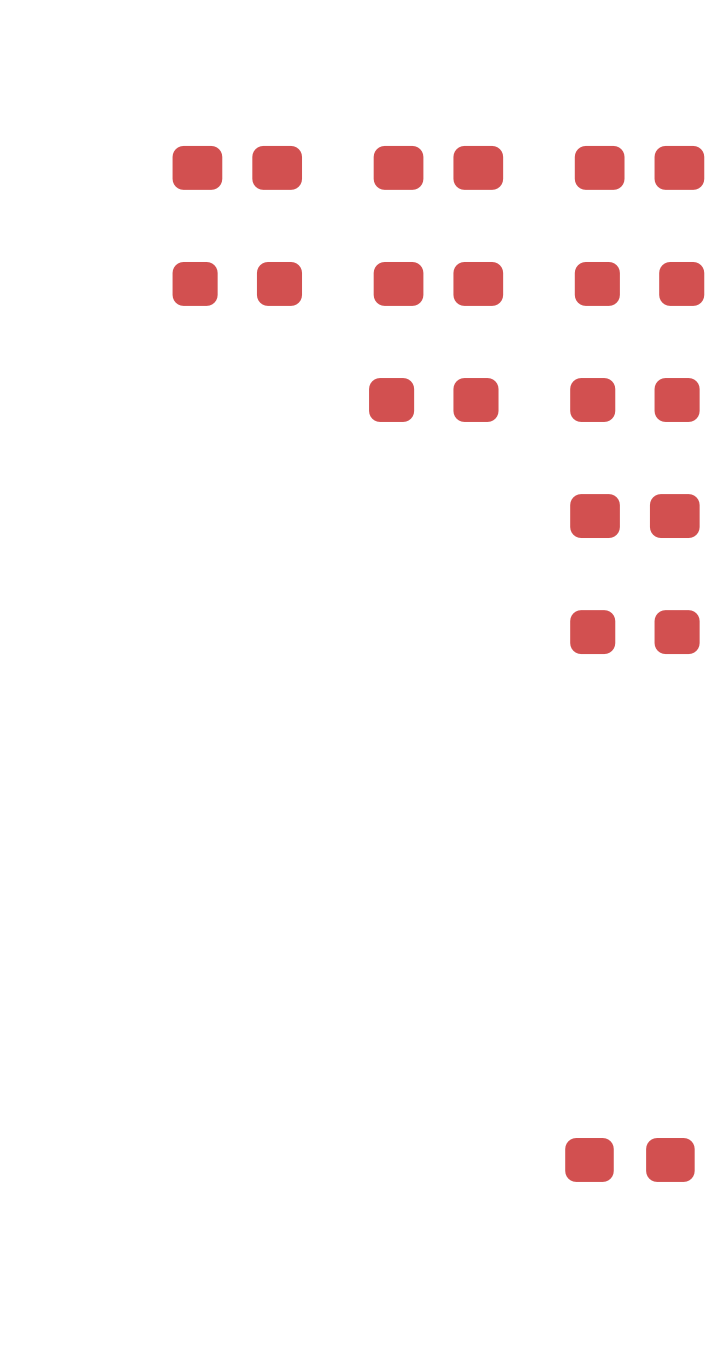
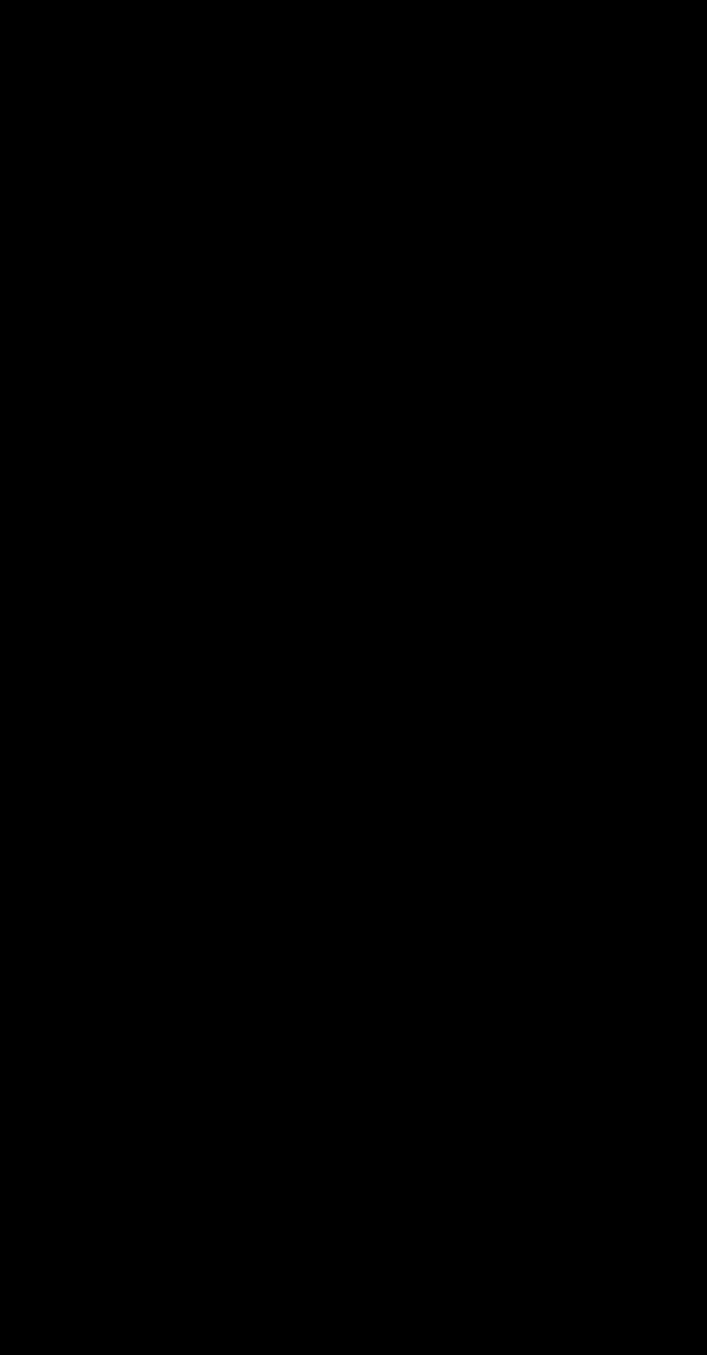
part: (237, 167) -> none
part: (438, 167) -> none
part: (639, 167) -> none
part: (237, 283) -> none
part: (438, 283) -> none
part: (639, 283) -> none
part: (433, 400) -> none
part: (634, 400) -> none
part: (634, 516) -> none
part: (634, 632) -> none
part: (629, 1159) -> none

